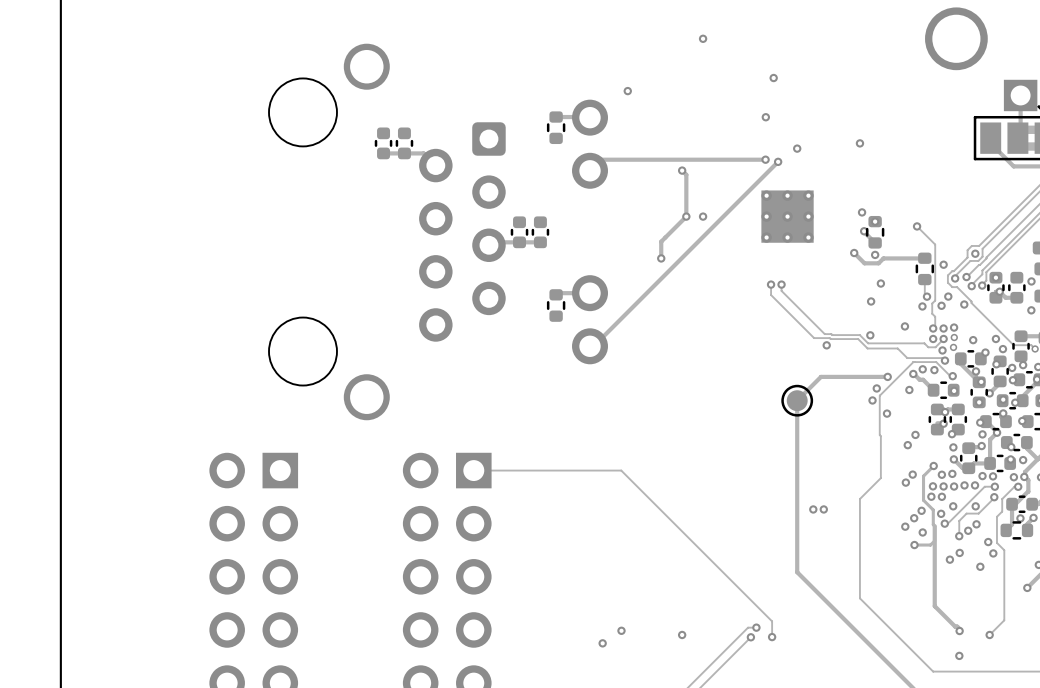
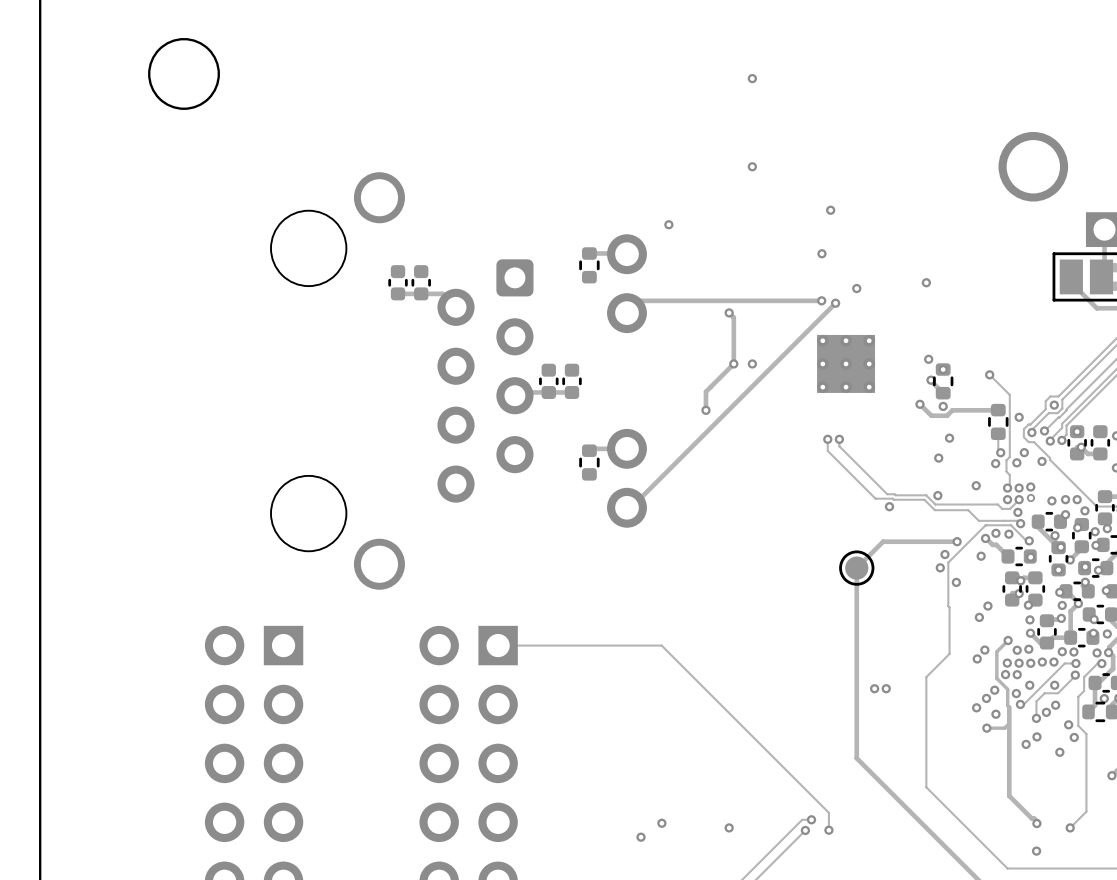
via: none -> (1065, 499)
via: (953, 347) -> none

